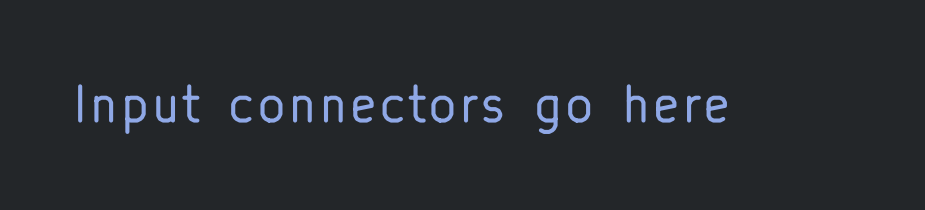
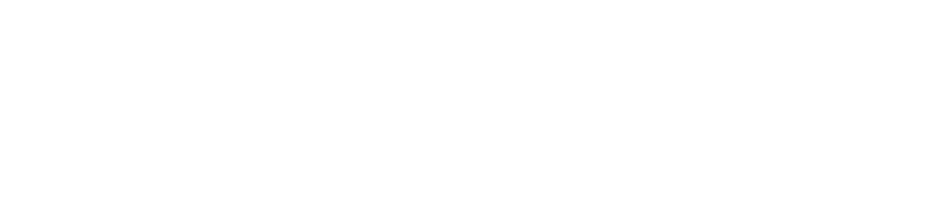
text: Input connectors go here (402, 109) -> none

